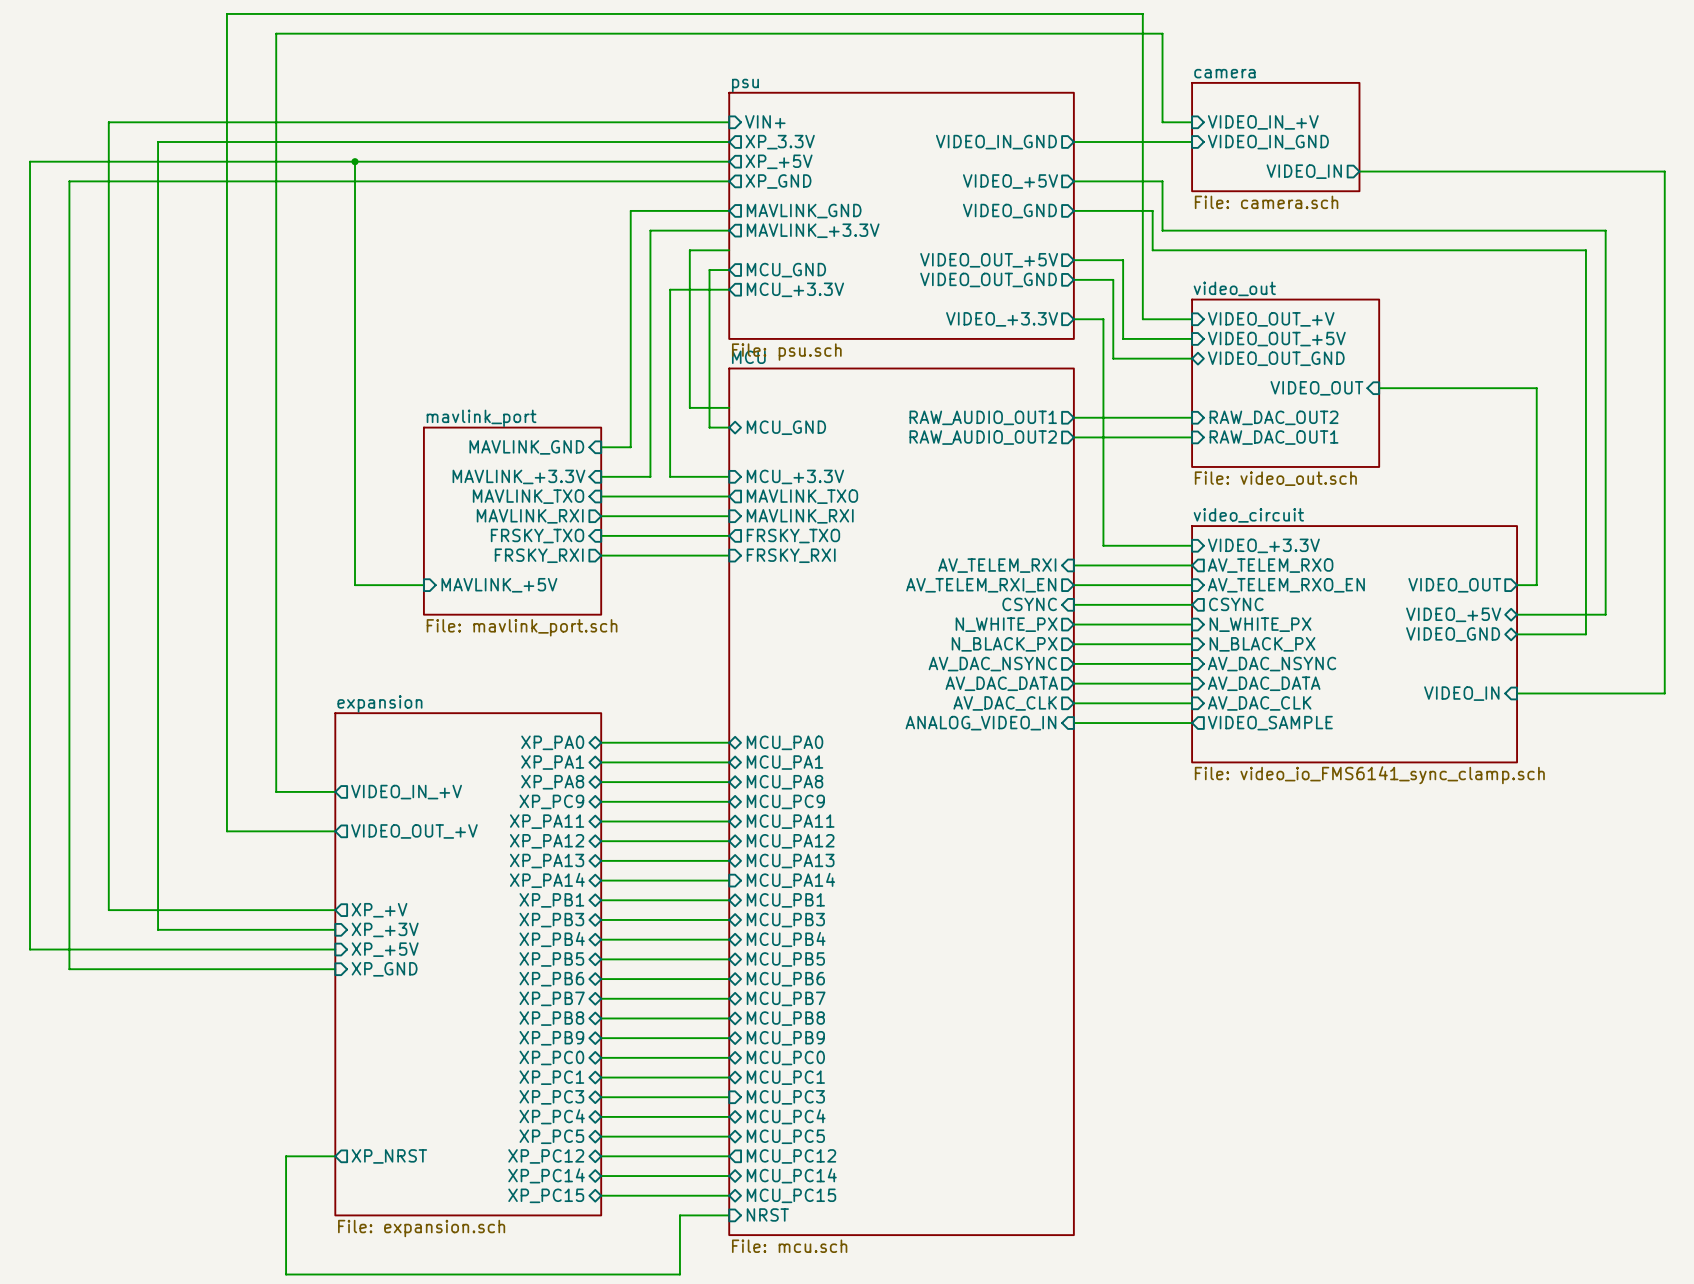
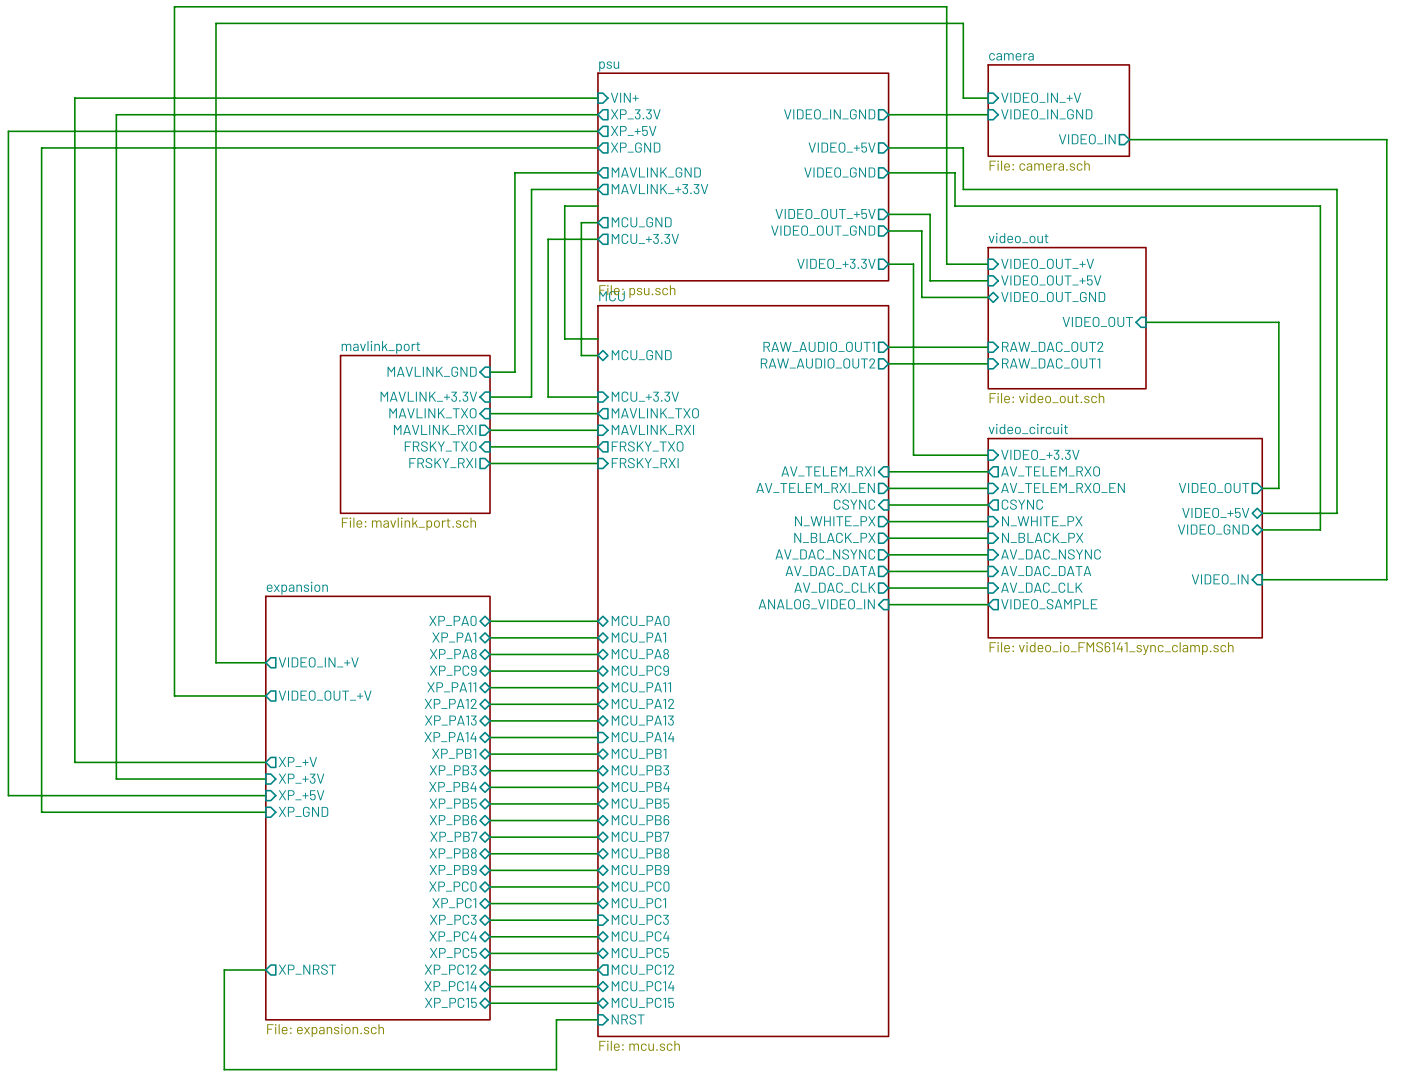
wire: (354, 161) (354, 585) (423, 585) -> none
junction: (354, 161) -> none
sheet pin: MAVLINK_+5V (499, 585) -> none

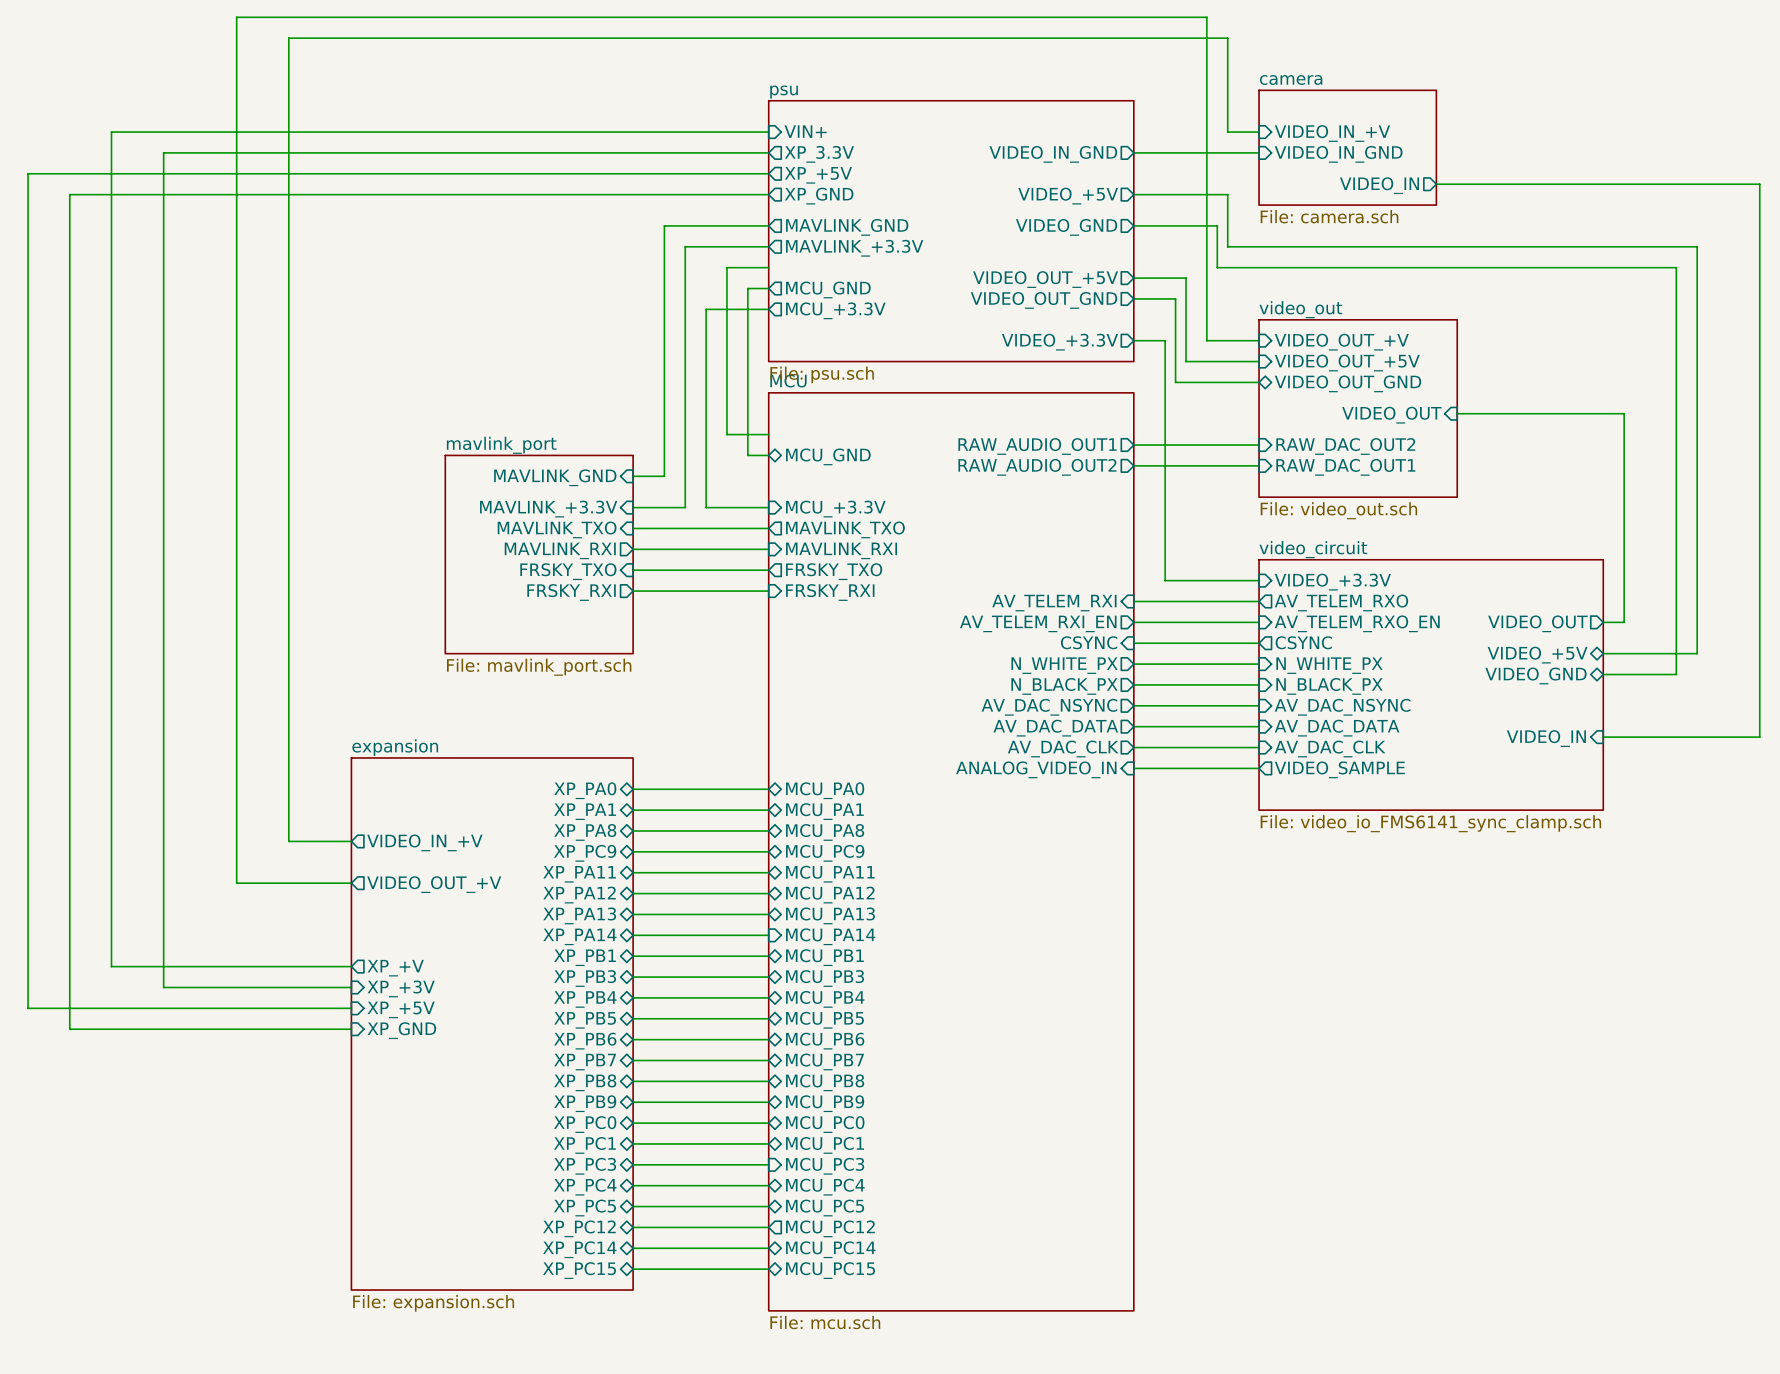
sheet pin: XP_NRST (307, 969) -> none
wire: (265, 970) (224, 970) (224, 1069) (556, 1069) (556, 1019) (597, 1019) -> none
sheet pin: NRST (628, 1019) -> none

